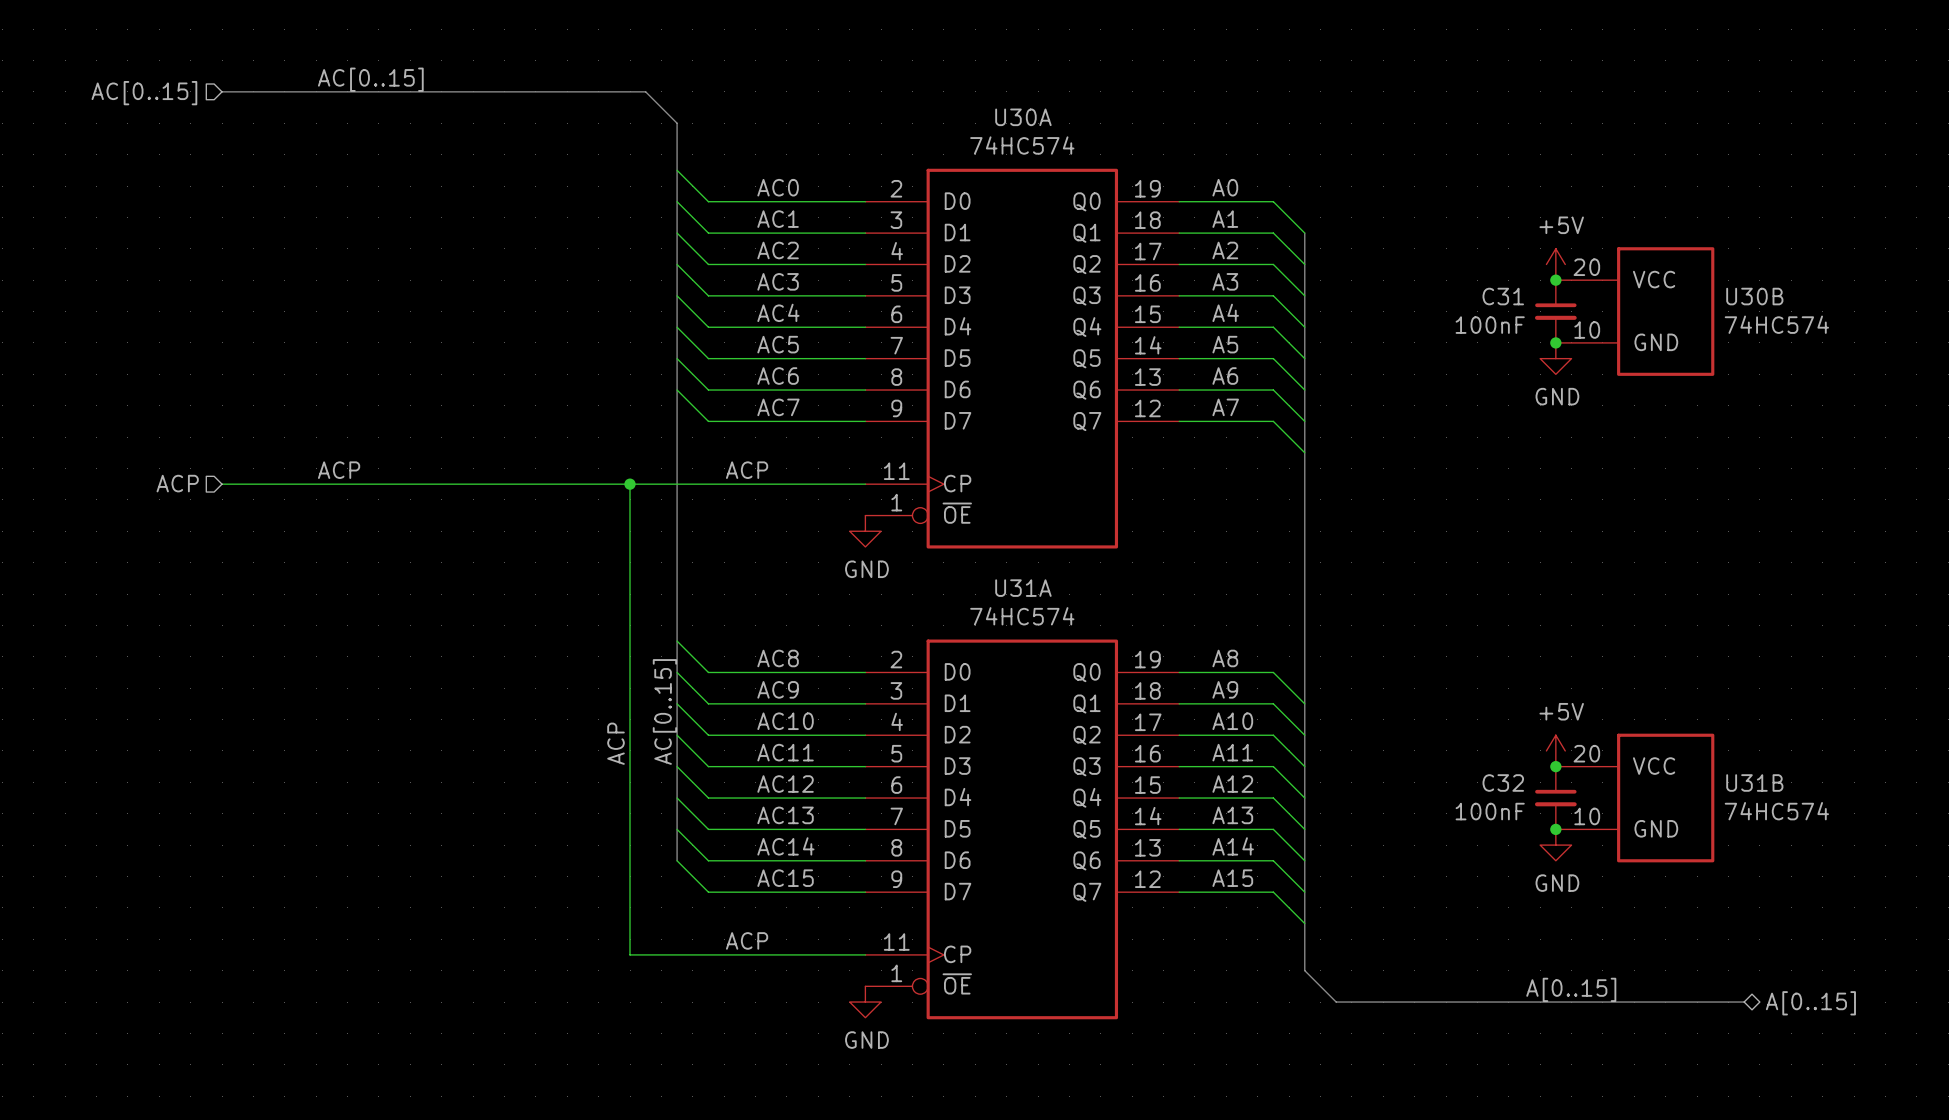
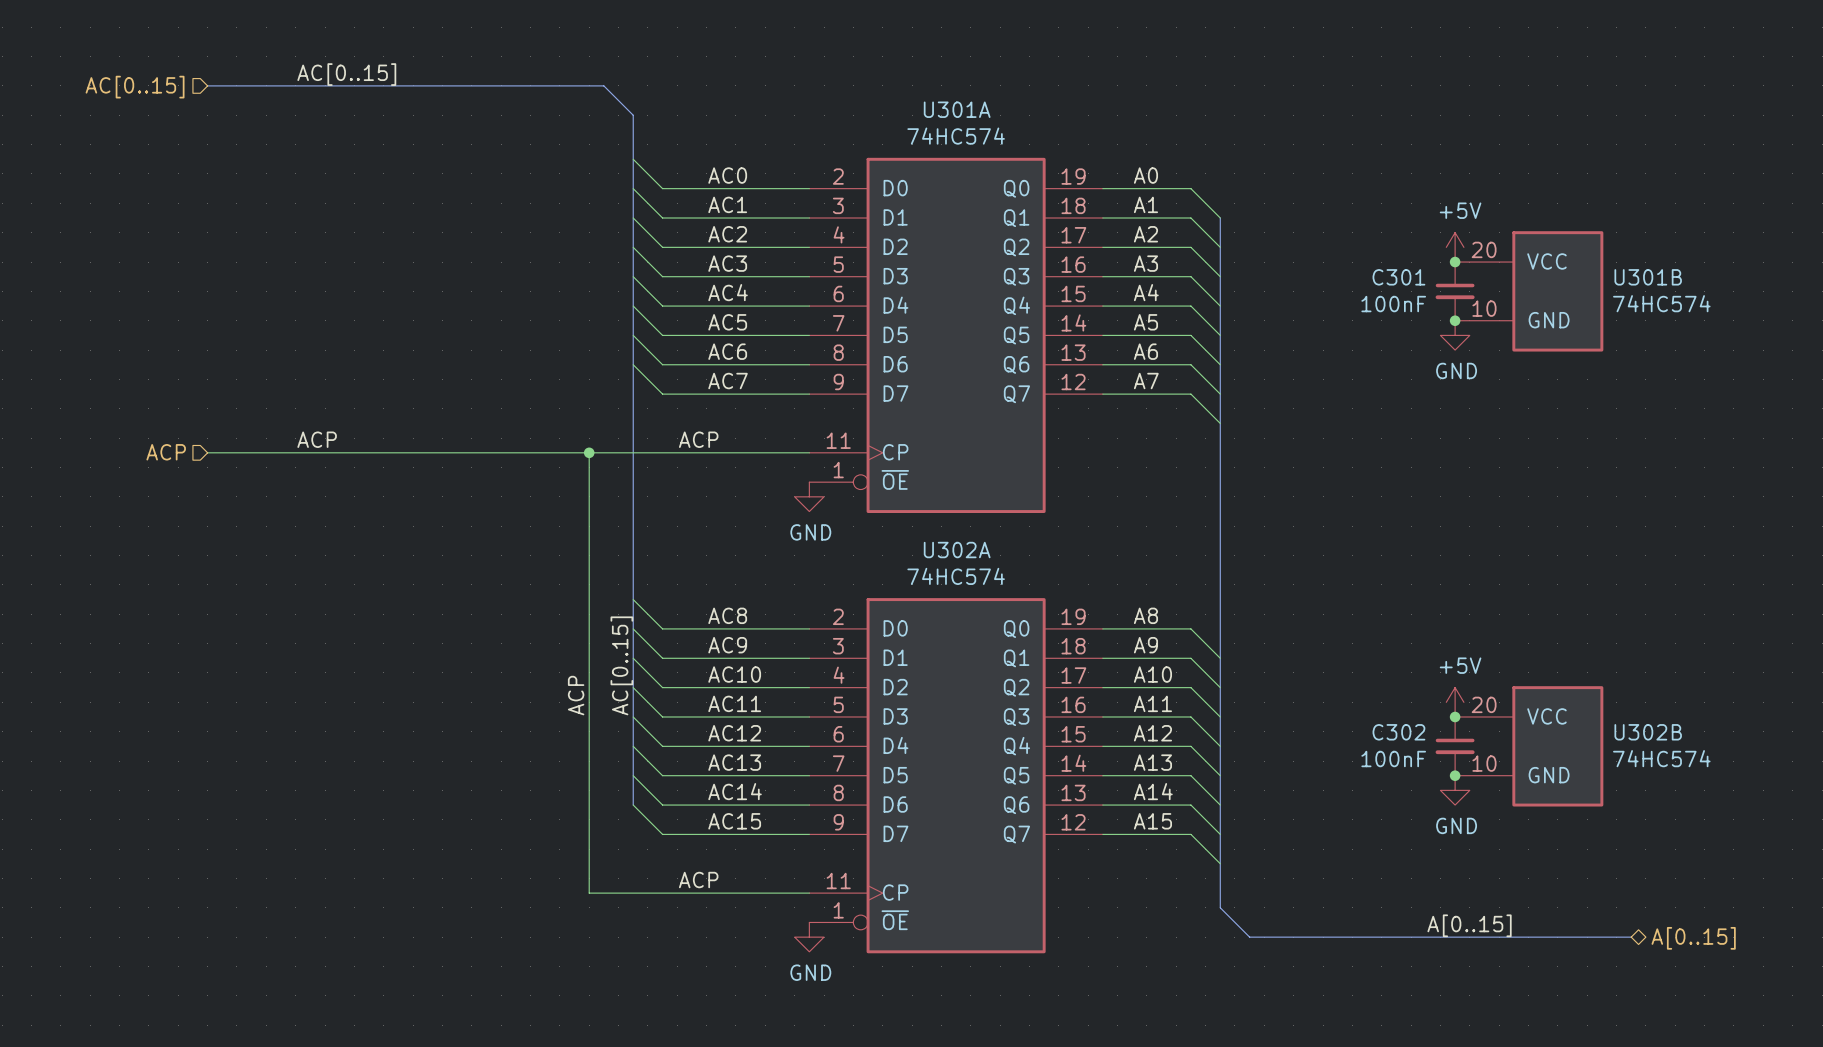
U30A name: U30A (1023, 117) -> U301A (957, 109)
C31 name: C31 (1503, 296) -> C301 (1398, 277)
U30B name: U30B (1754, 296) -> U301B (1648, 277)
U31A name: U31A (1023, 588) -> U302A (957, 550)
C32 name: C32 (1503, 782) -> C302 (1398, 732)
U31B name: U31B (1754, 782) -> U302B (1648, 732)

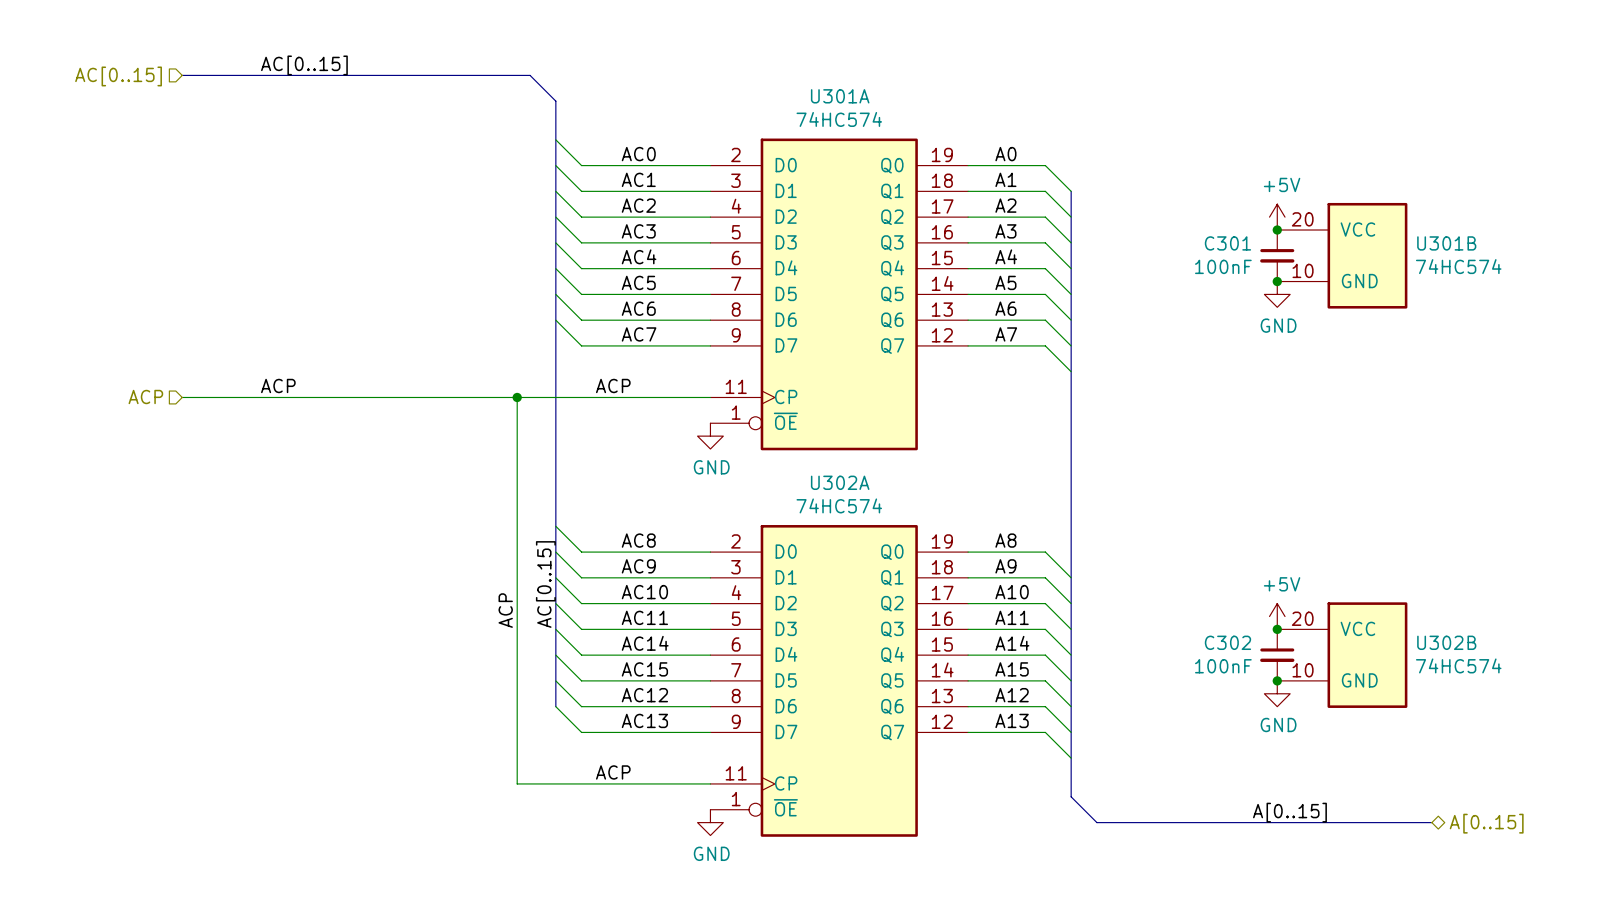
label: AC12 (734, 733) -> AC14 (645, 643)
label: A12 (1152, 733) -> A14 (1012, 643)
label: AC13 (734, 762) -> AC15 (644, 669)
label: A13 (1152, 762) -> A15 (1012, 669)
label: AC14 (735, 791) -> AC12 (644, 695)
label: A14 (1153, 791) -> A12 (1012, 695)
label: AC15 (734, 821) -> AC13 (644, 720)
label: A15 (1152, 821) -> A13 (1012, 720)

